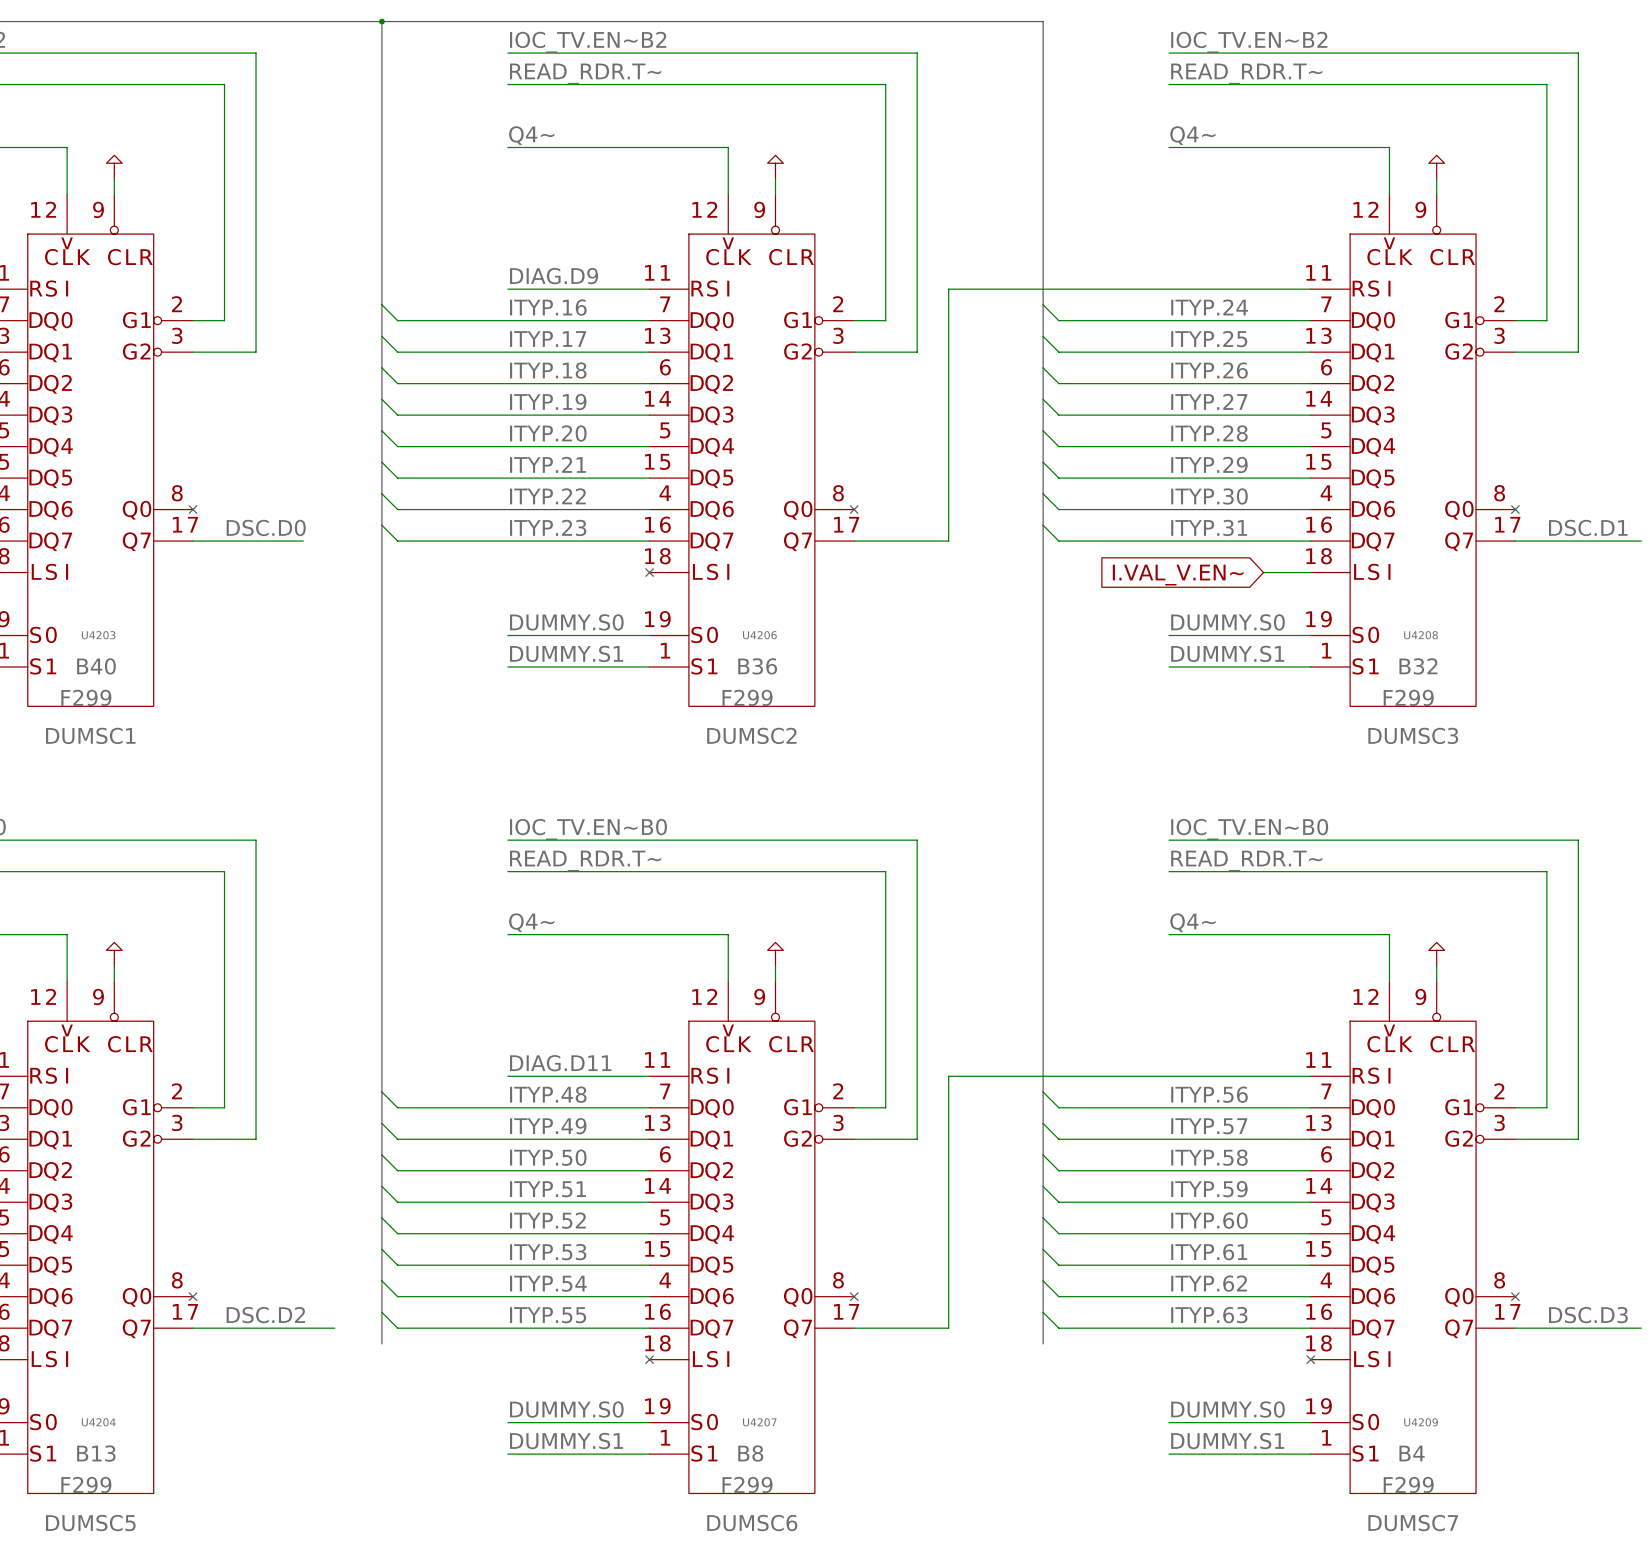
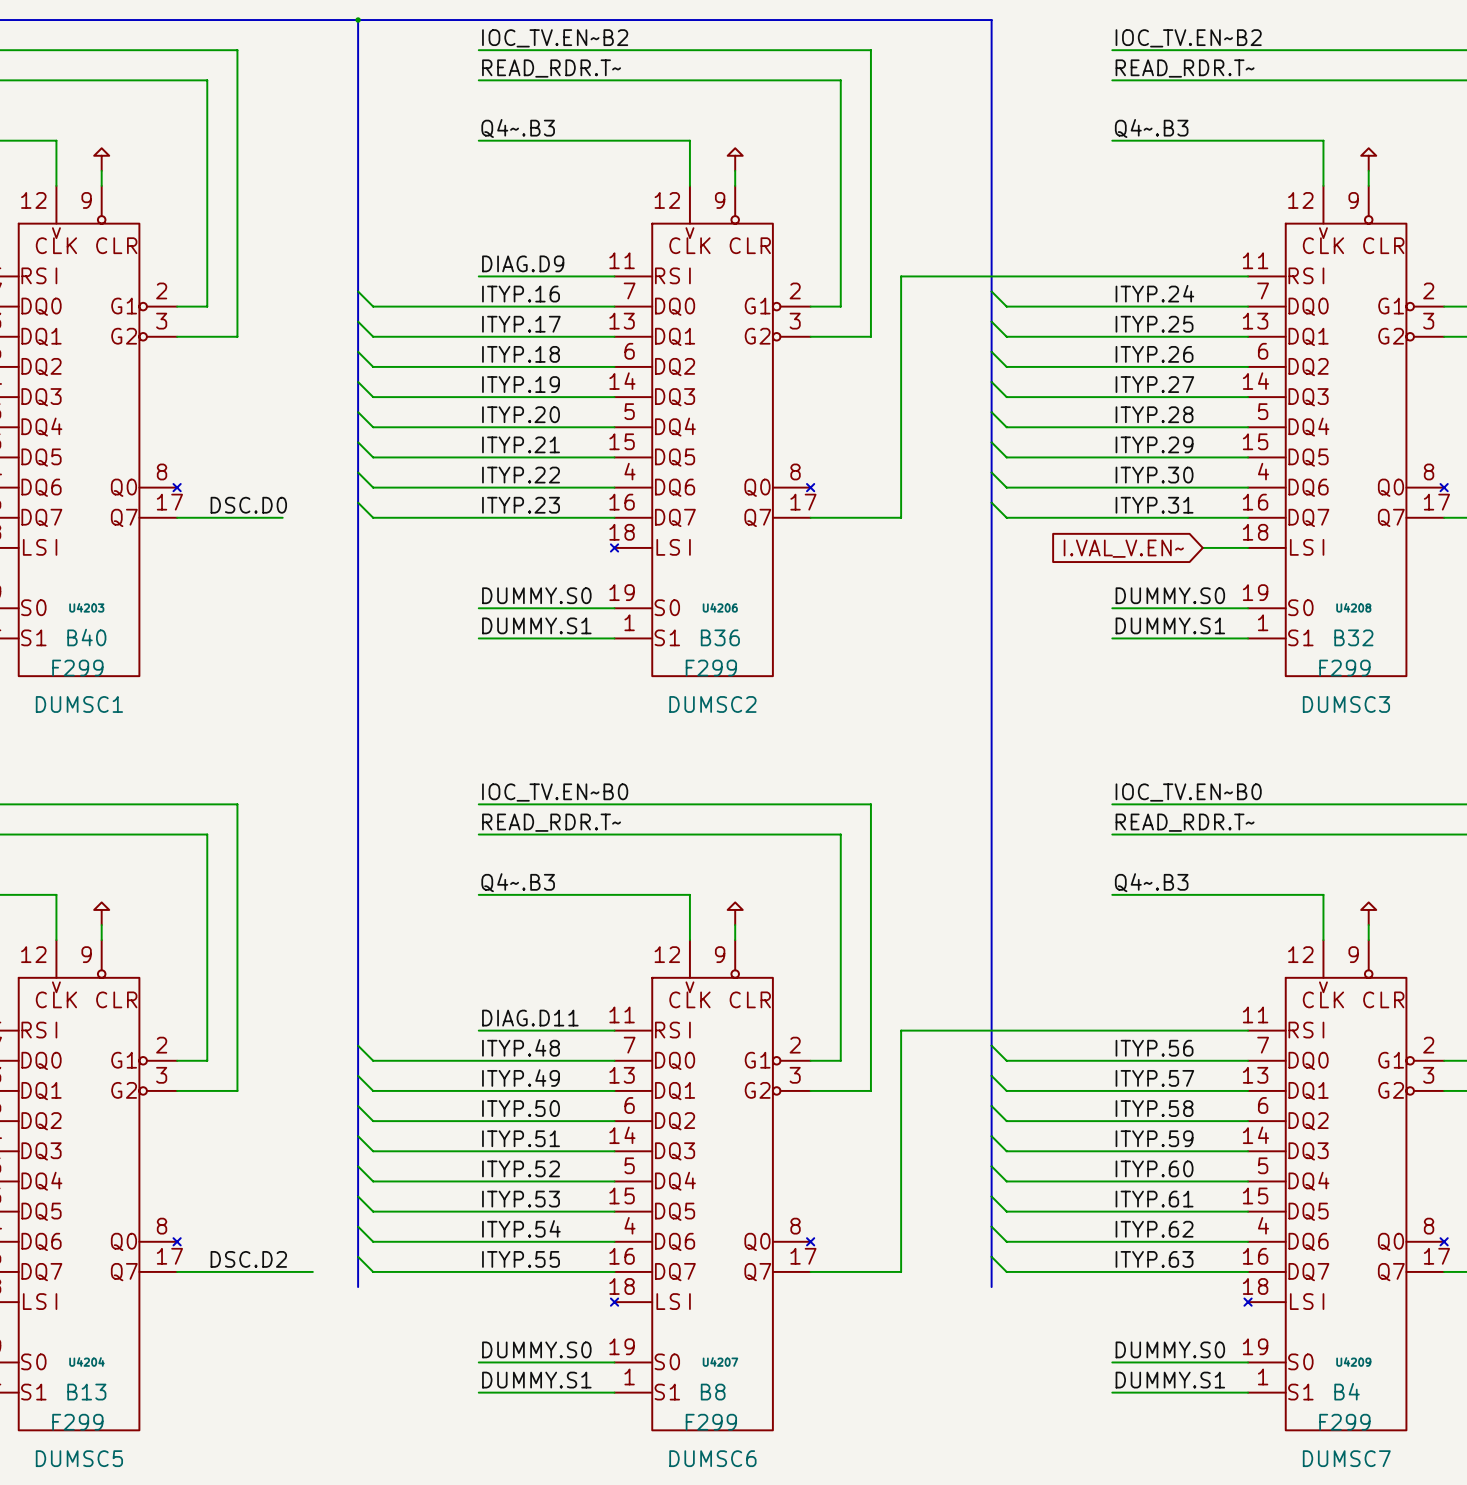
label: Q4~ (531, 135) -> Q4~.B3 (518, 128)
label: Q4~ (1192, 135) -> Q4~.B3 (1151, 128)
label: Q4~ (531, 922) -> Q4~.B3 (518, 882)
label: Q4~ (1192, 922) -> Q4~.B3 (1151, 882)

